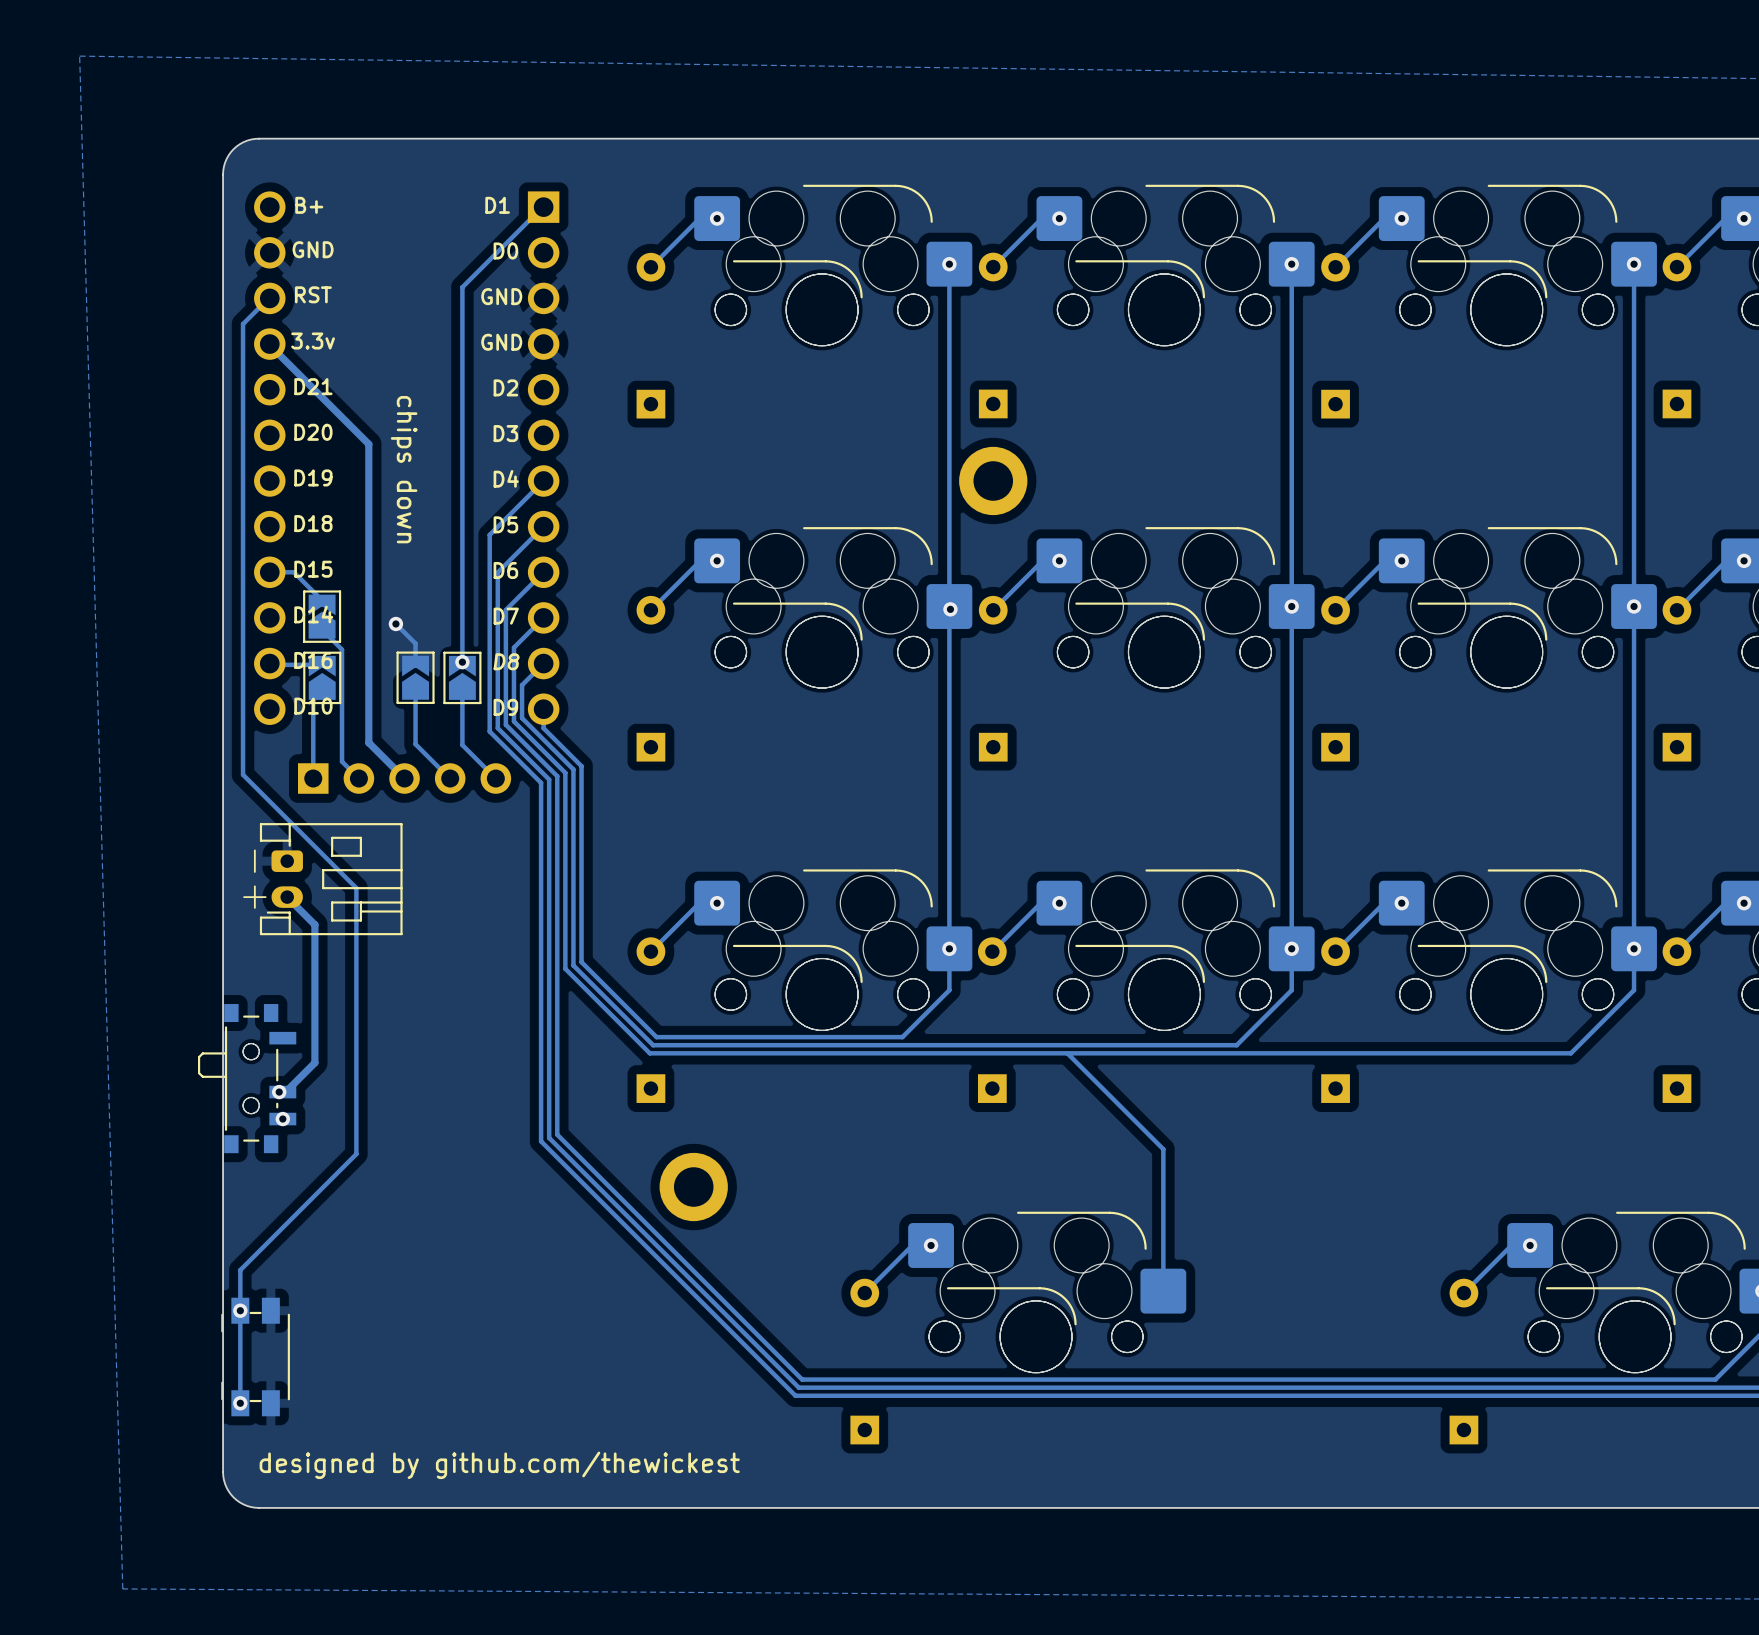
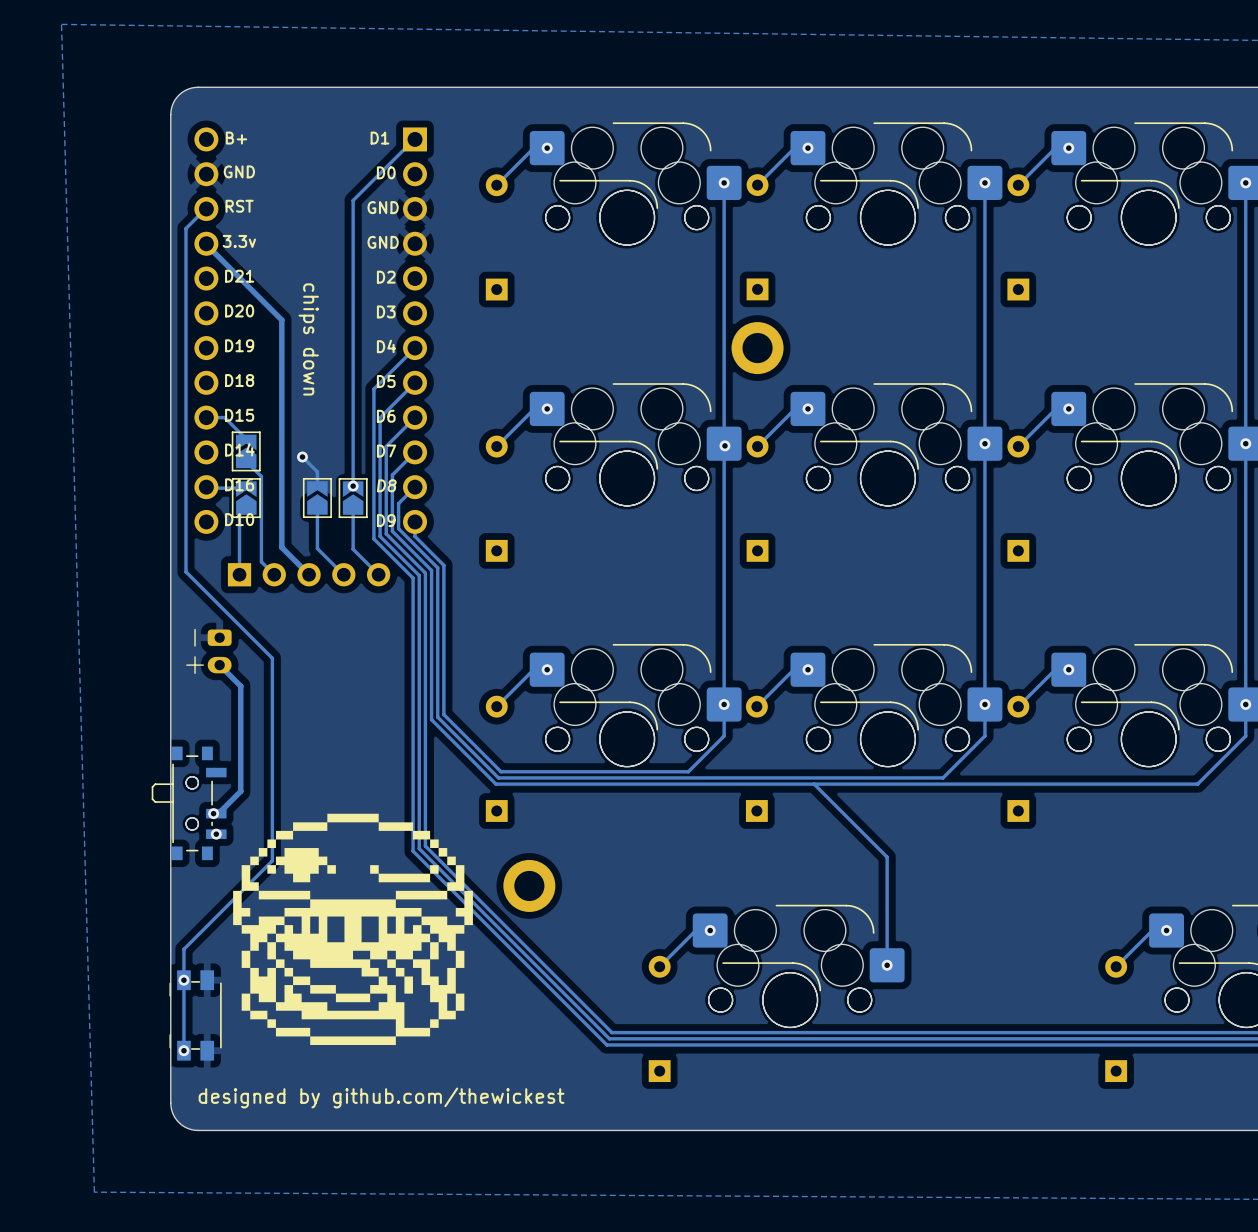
part: (322, 879) -> none
drawing: none -> [233, 813, 473, 1046]
via: none -> (887, 965)

